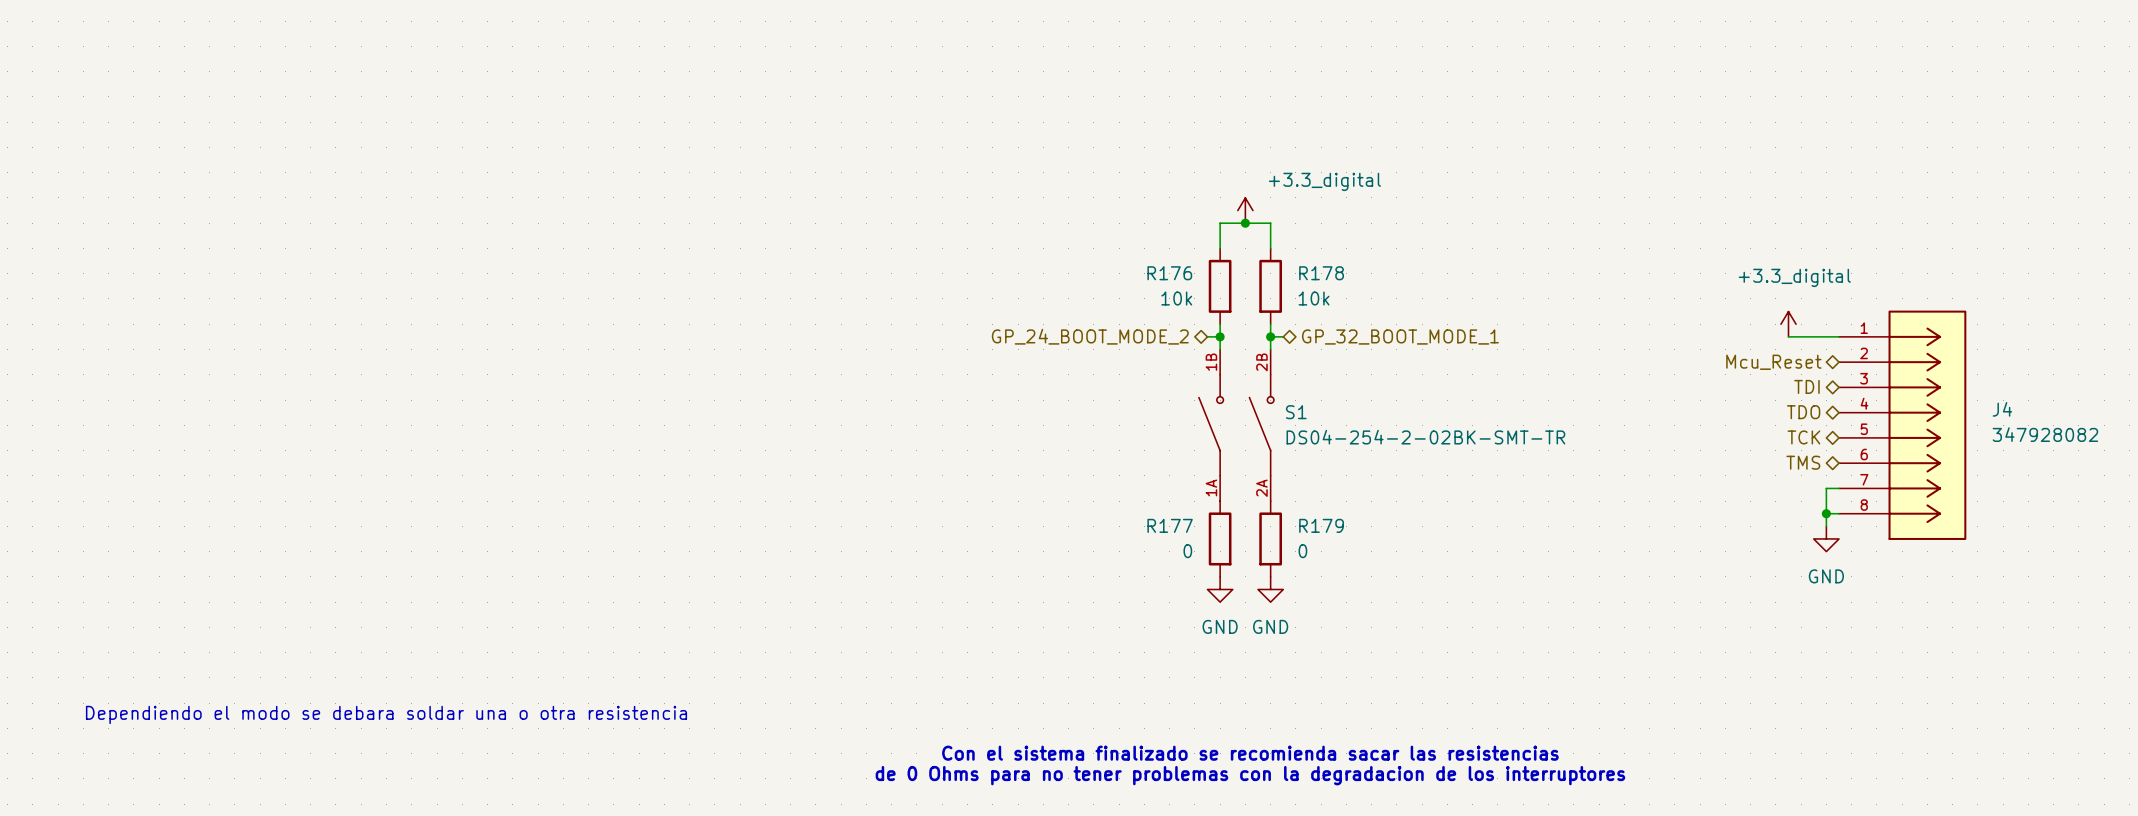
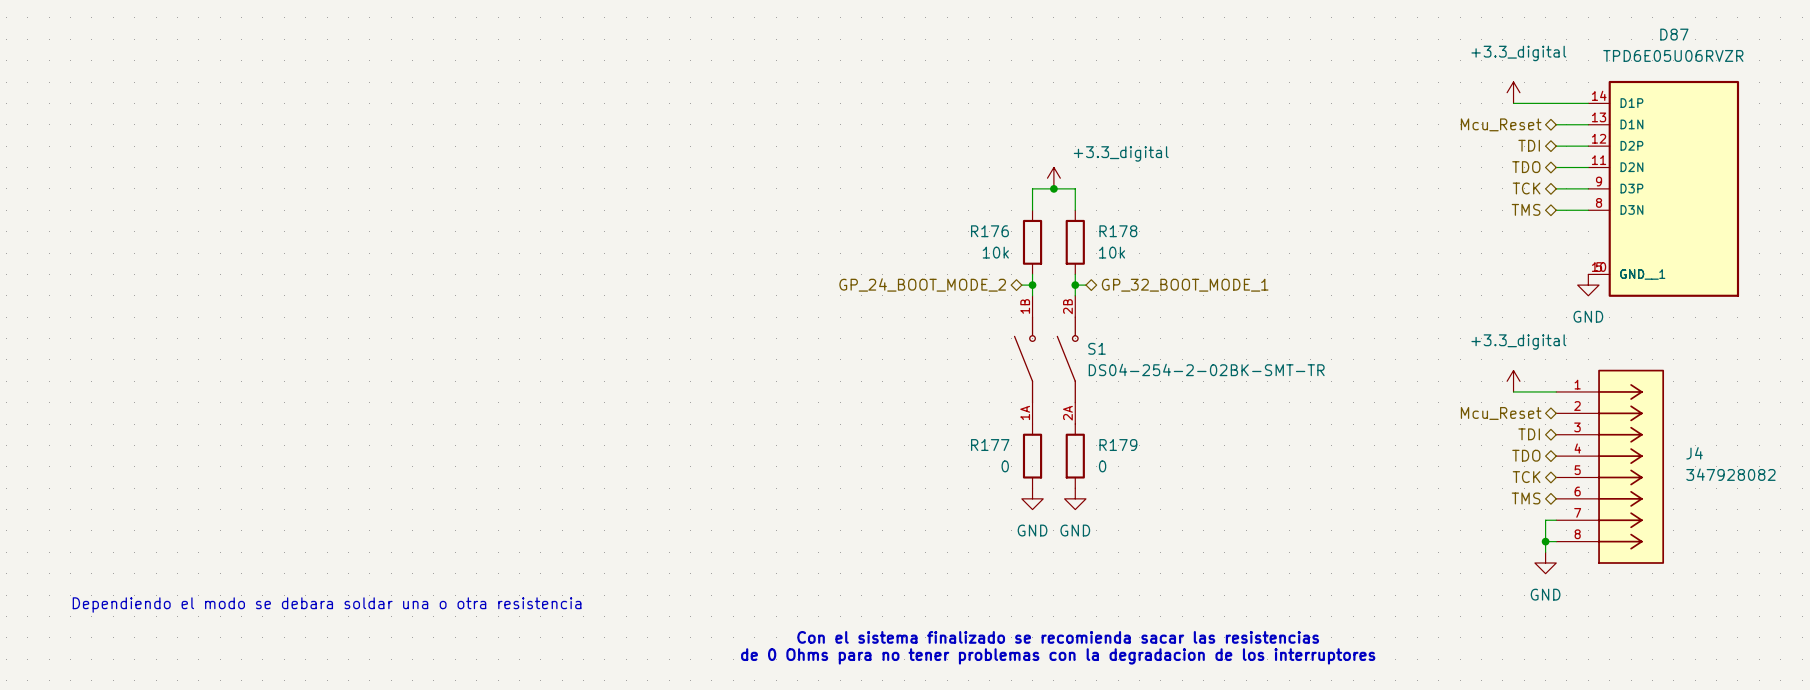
power symbol: none -> +3.3_digital (1513, 92)
wire: none -> (1513, 103) (1588, 103)
hierarchical label: none -> Mcu_Reset (1501, 124)
wire: none -> (1556, 124) (1588, 124)
hierarchical label: none -> TDI (1529, 145)
wire: none -> (1556, 146) (1588, 146)
hierarchical label: none -> TDO (1526, 167)
wire: none -> (1556, 167) (1588, 167)
hierarchical label: none -> TCK (1526, 188)
wire: none -> (1556, 188) (1588, 188)
D87: none -> TPD6E05U06RVZR (1663, 188)
hierarchical label: none -> TMS (1526, 209)
wire: none -> (1556, 210) (1588, 210)
power symbol: +3.3_digital (1788, 324) -> none
wire: (1788, 336) (1839, 336) -> (1513, 391) (1556, 391)
power symbol: none -> GND (1588, 285)
hierarchical label: Mcu_Reset (1773, 362) -> none
hierarchical label: TDI (1806, 386) -> none
hierarchical label: TDO (1803, 412) -> none
J4 position: (1902, 425) -> (1610, 466)
hierarchical label: TCK (1803, 437) -> none
power symbol: none -> +3.3_digital (1513, 381)
hierarchical label: TMS (1803, 462) -> none
hierarchical label: none -> Mcu_Reset (1501, 413)
wire: (1839, 488) (1826, 488) (1826, 526) -> (1556, 520) (1545, 520) (1545, 552)
hierarchical label: none -> TDI (1529, 434)
wire: (1826, 513) (1839, 513) -> (1545, 541) (1556, 541)
junction: (1826, 513) -> none
hierarchical label: none -> TDO (1526, 455)
power symbol: GND (1826, 538) -> none
hierarchical label: none -> TCK (1526, 477)
hierarchical label: none -> TMS (1526, 498)
junction: none -> (1545, 541)
power symbol: none -> GND (1545, 563)

